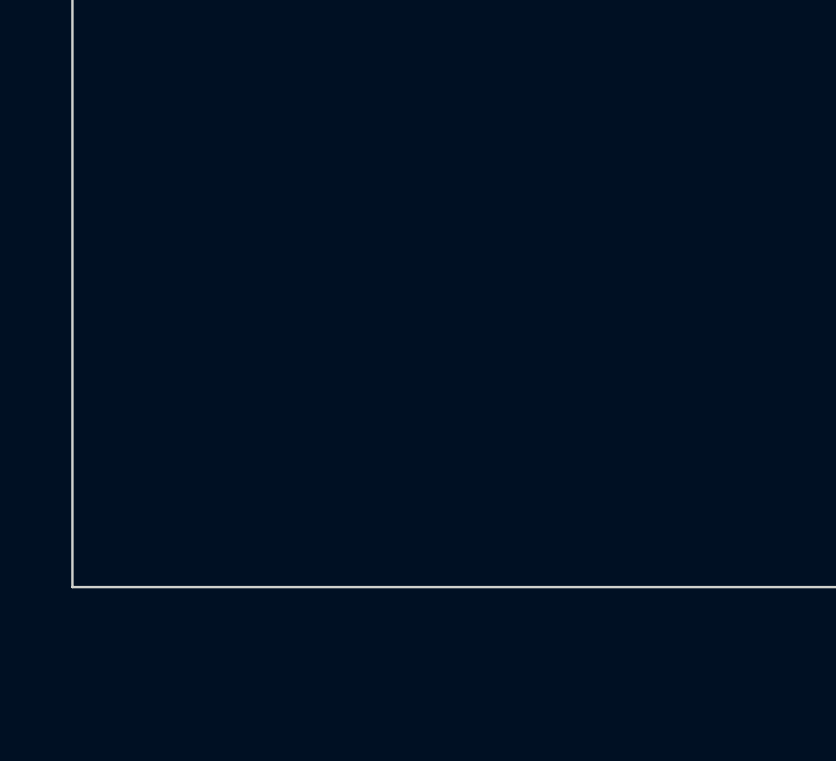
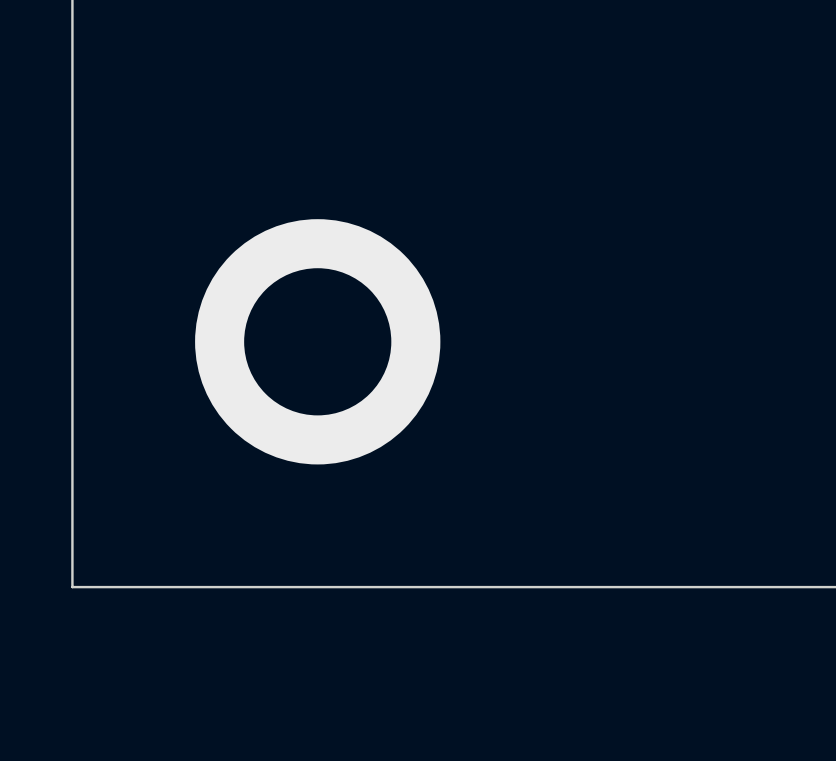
via: none -> (317, 341)

